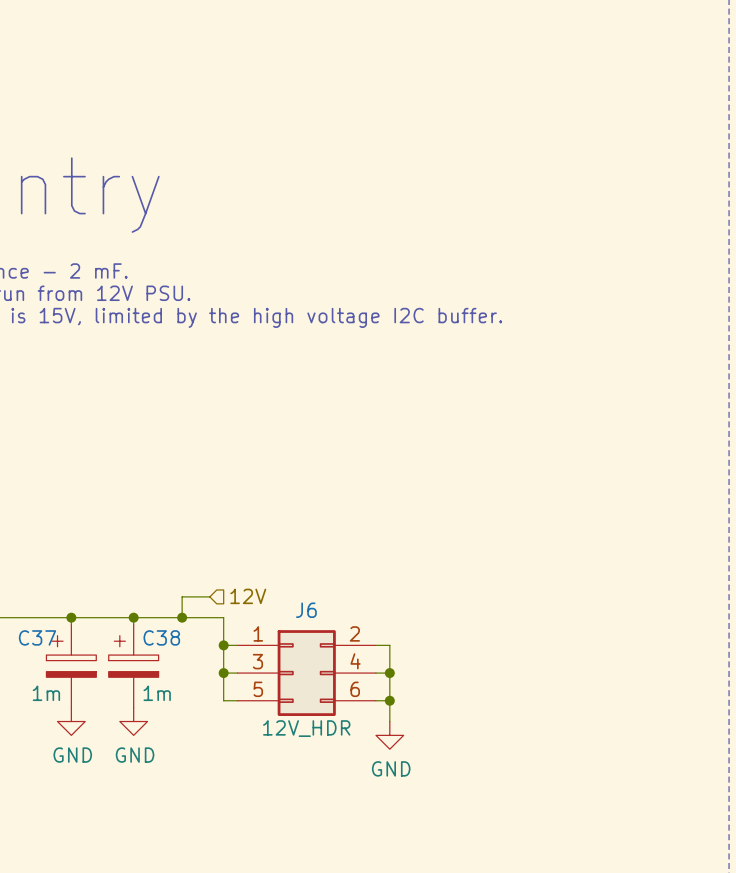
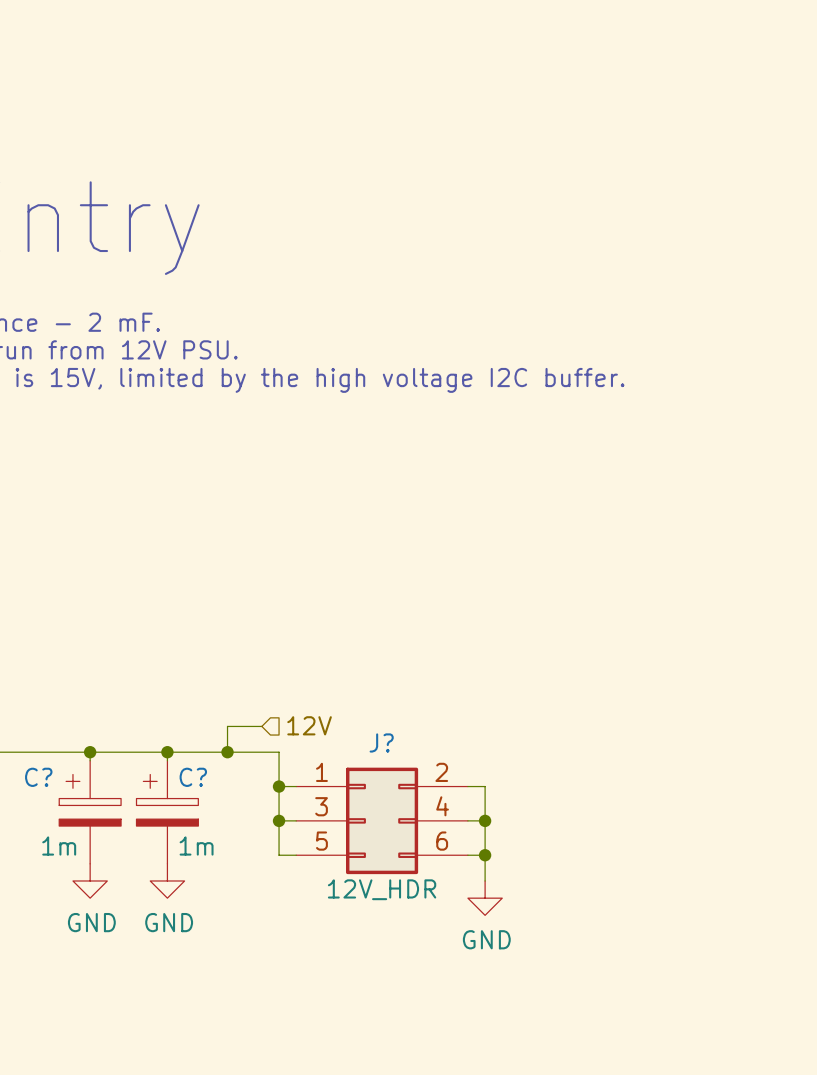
J6 name: J6 (306, 610) -> J? (381, 742)
C37 name: C37 (37, 637) -> C? (38, 777)
C38 name: C38 (161, 637) -> C? (193, 777)

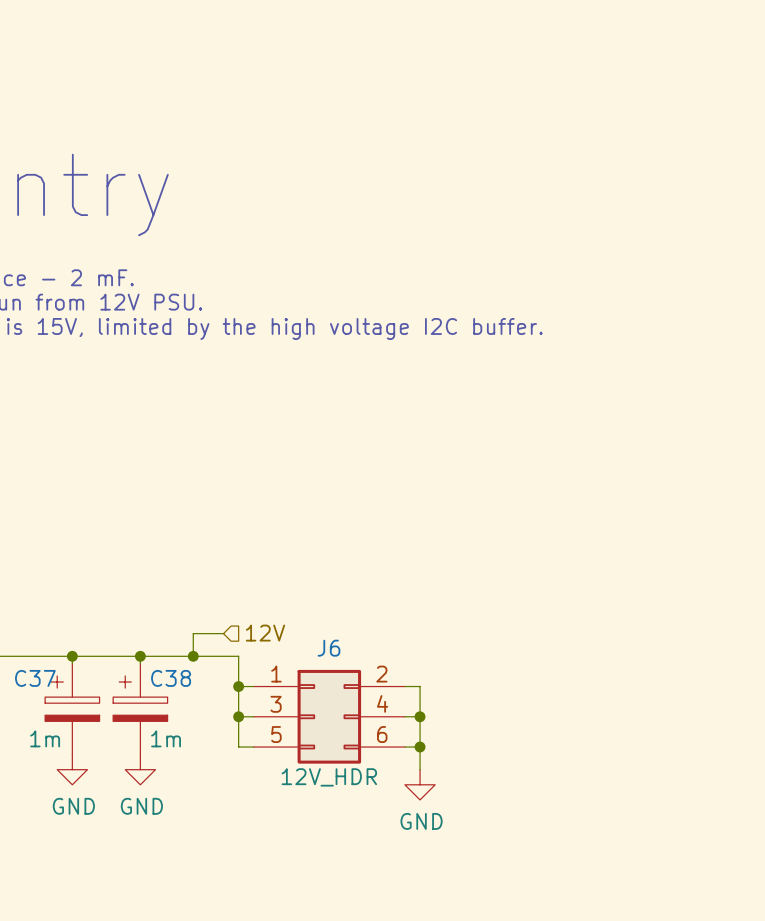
J? name: J? (381, 742) -> J6 (328, 648)
C? name: C? (38, 777) -> C37 (35, 678)
C? name: C? (193, 777) -> C38 (171, 678)

